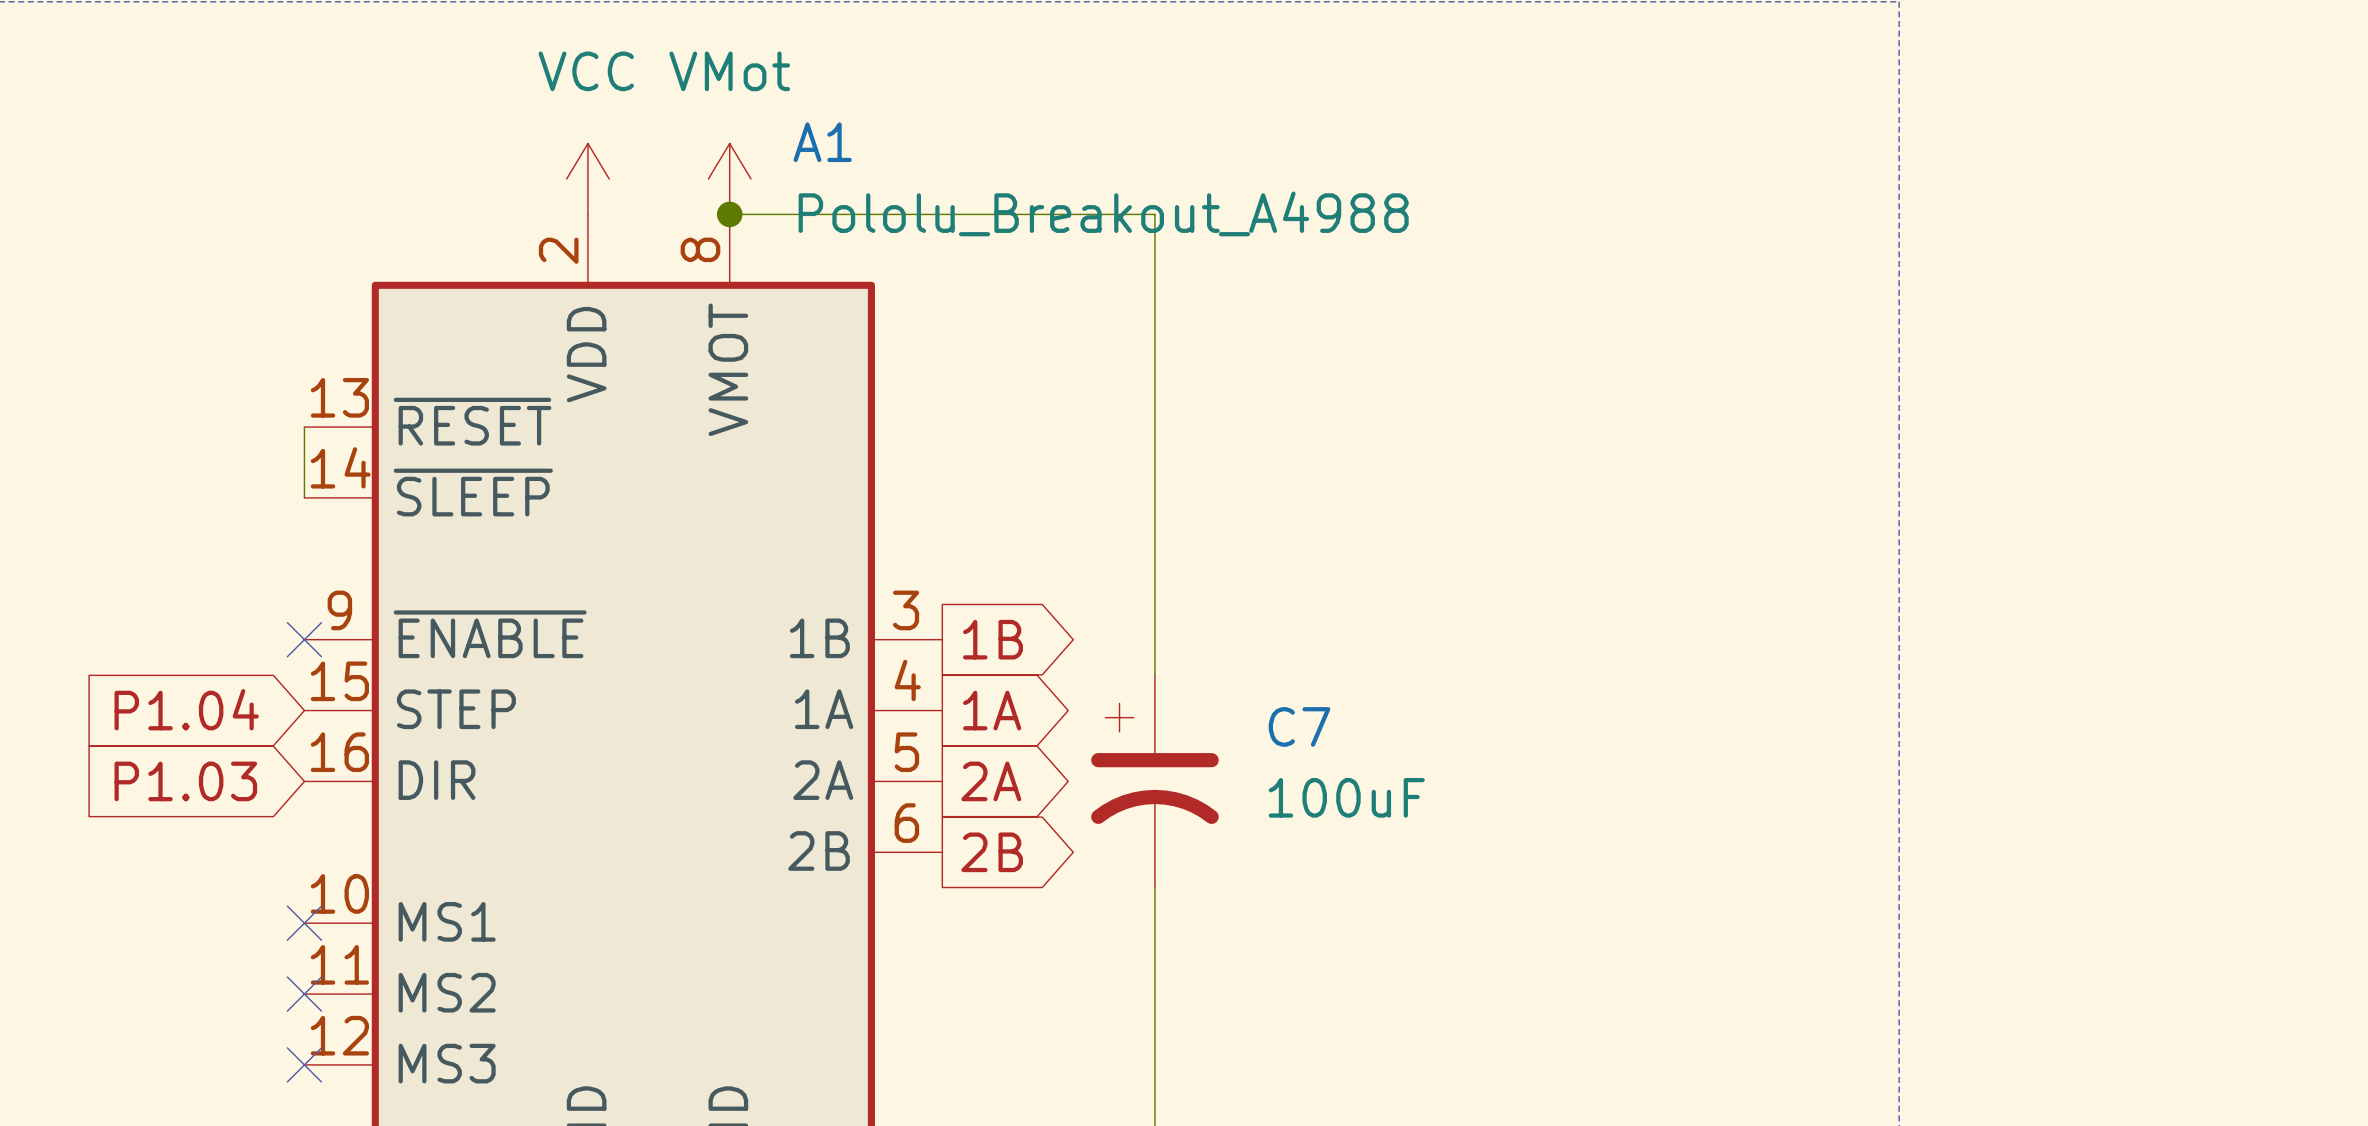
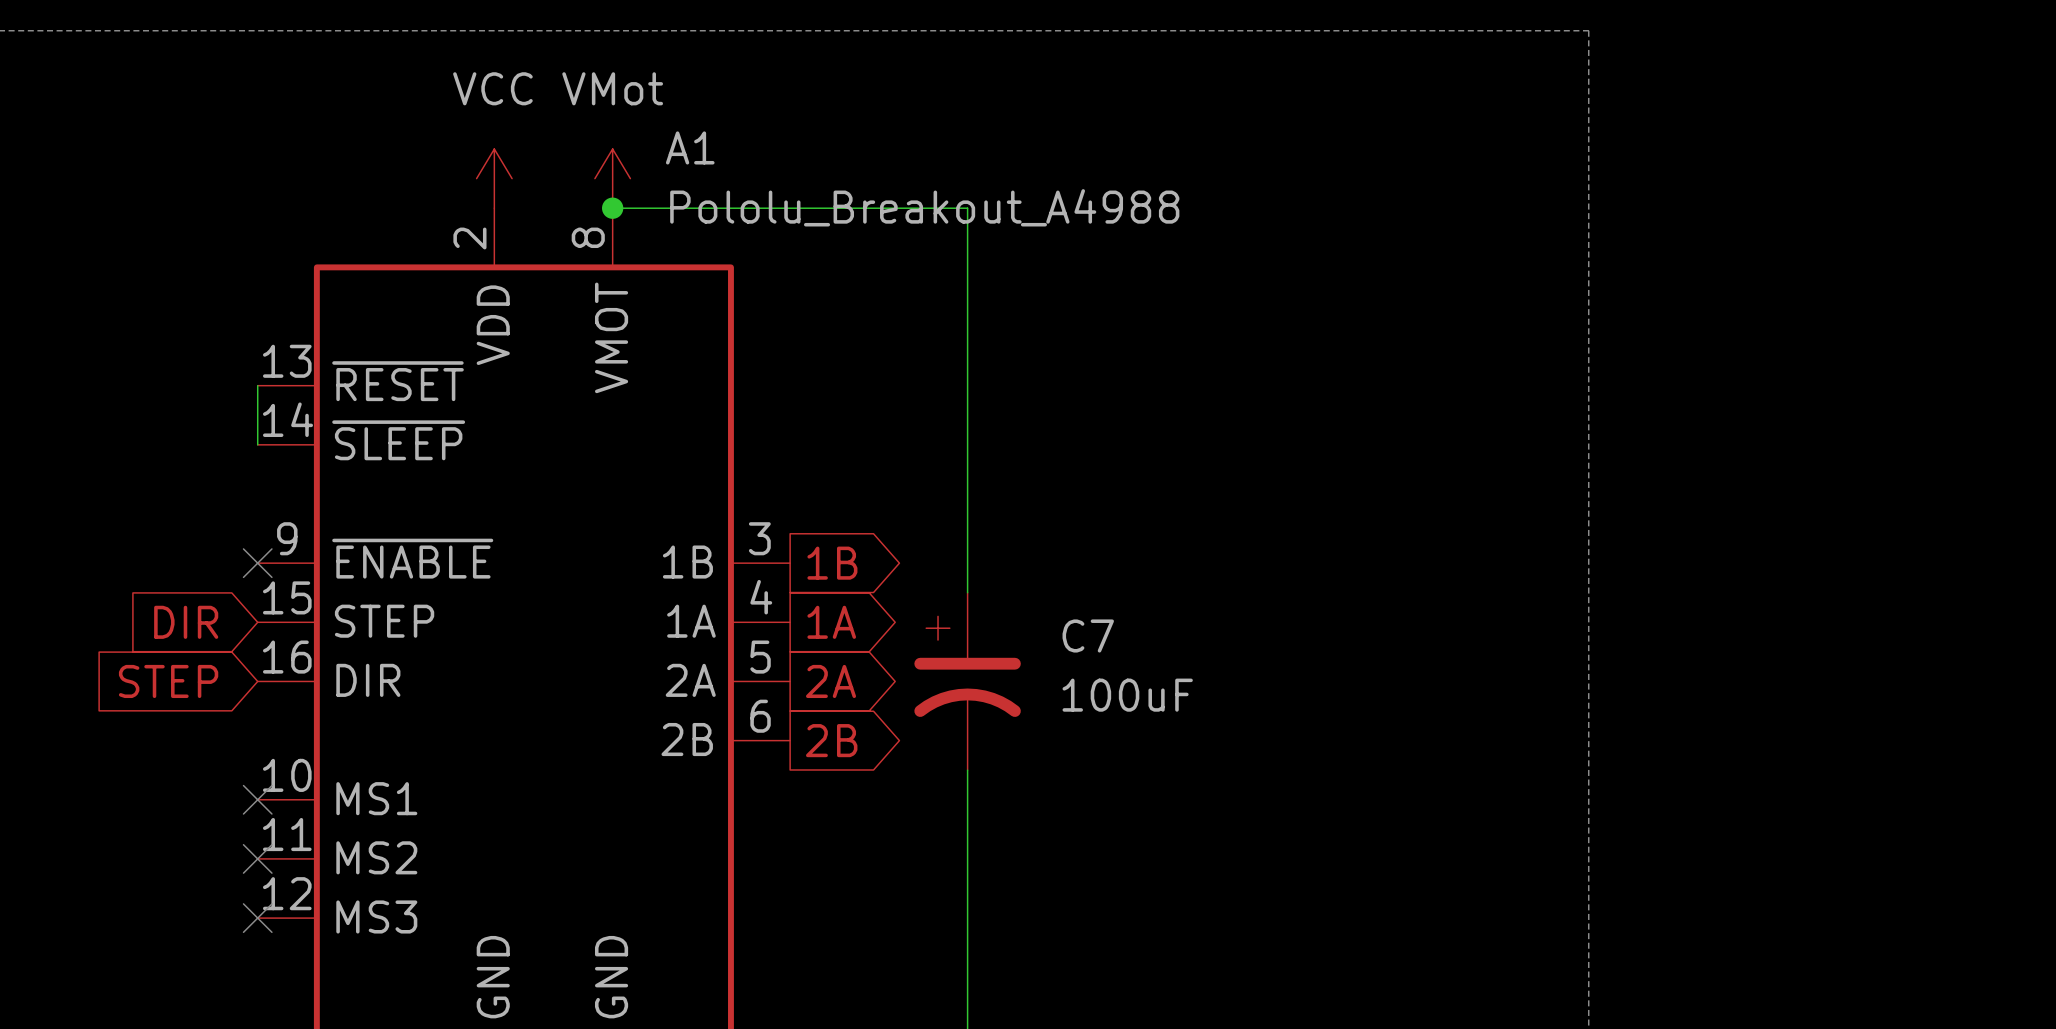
global label: P1.04 (186, 709) -> DIR (186, 622)
global label: P1.03 (185, 781) -> STEP (168, 681)

